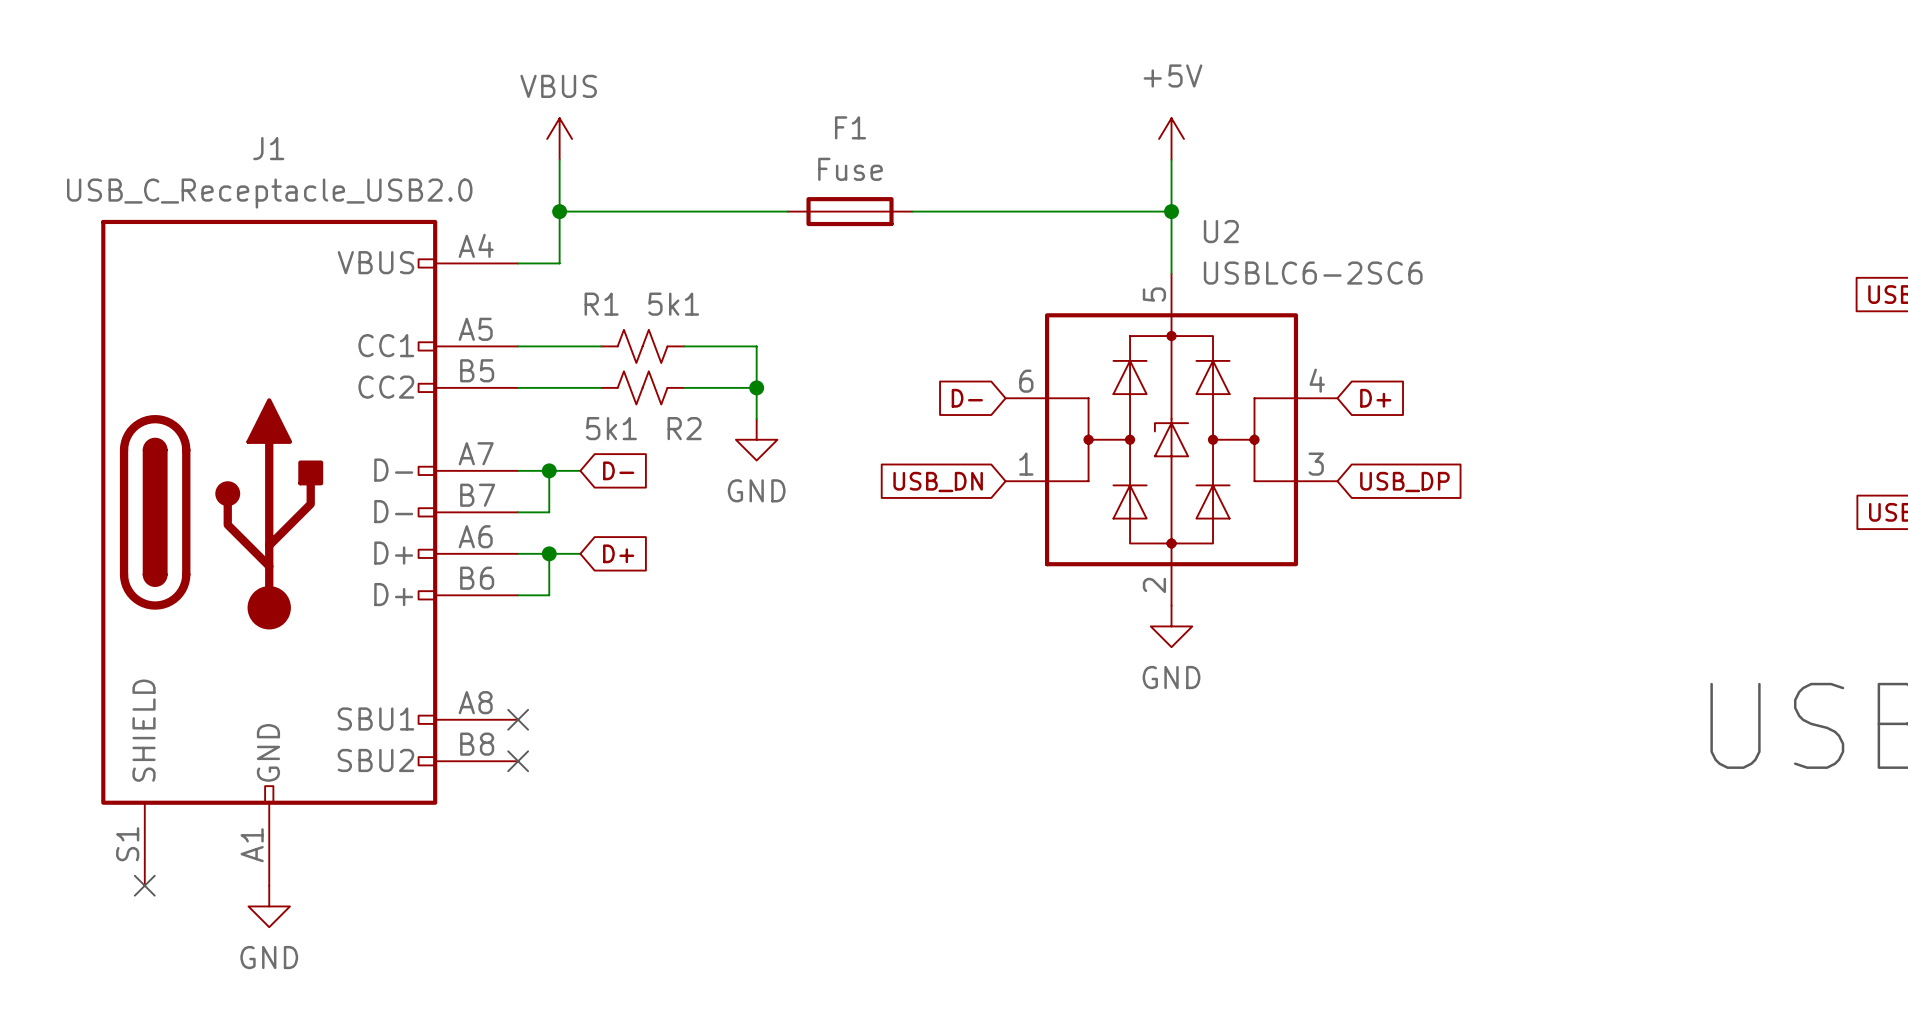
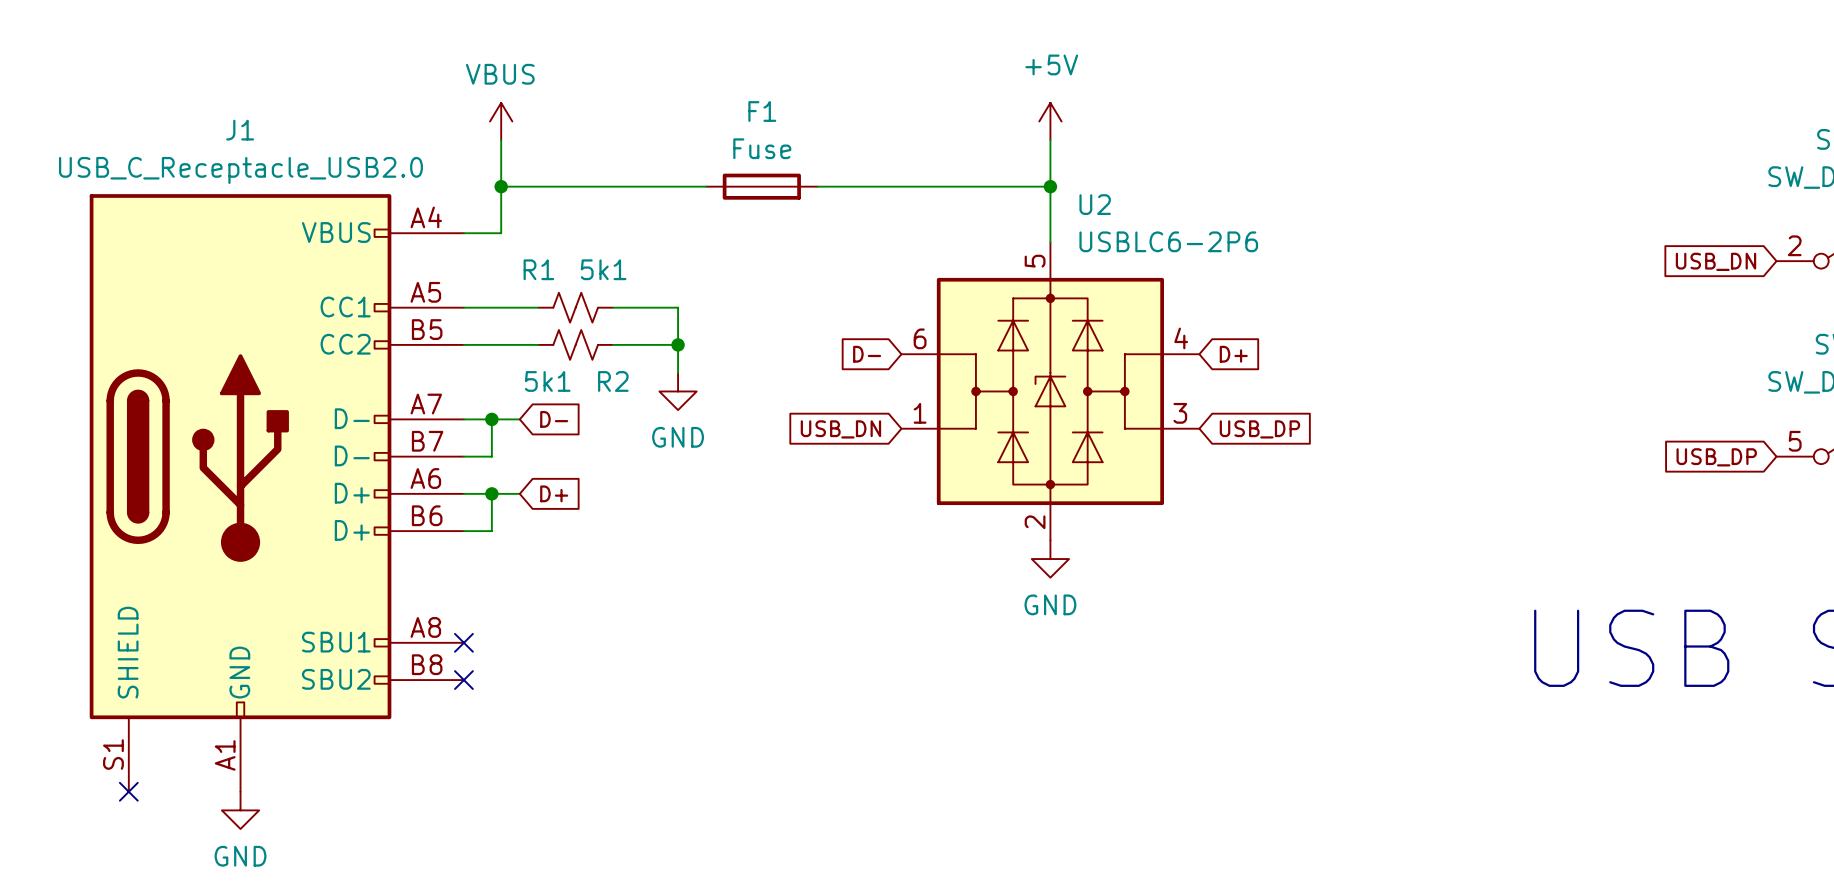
U2 value: USBLC6-2SC6 (1313, 273) -> USBLC6-2P6 (1168, 241)

